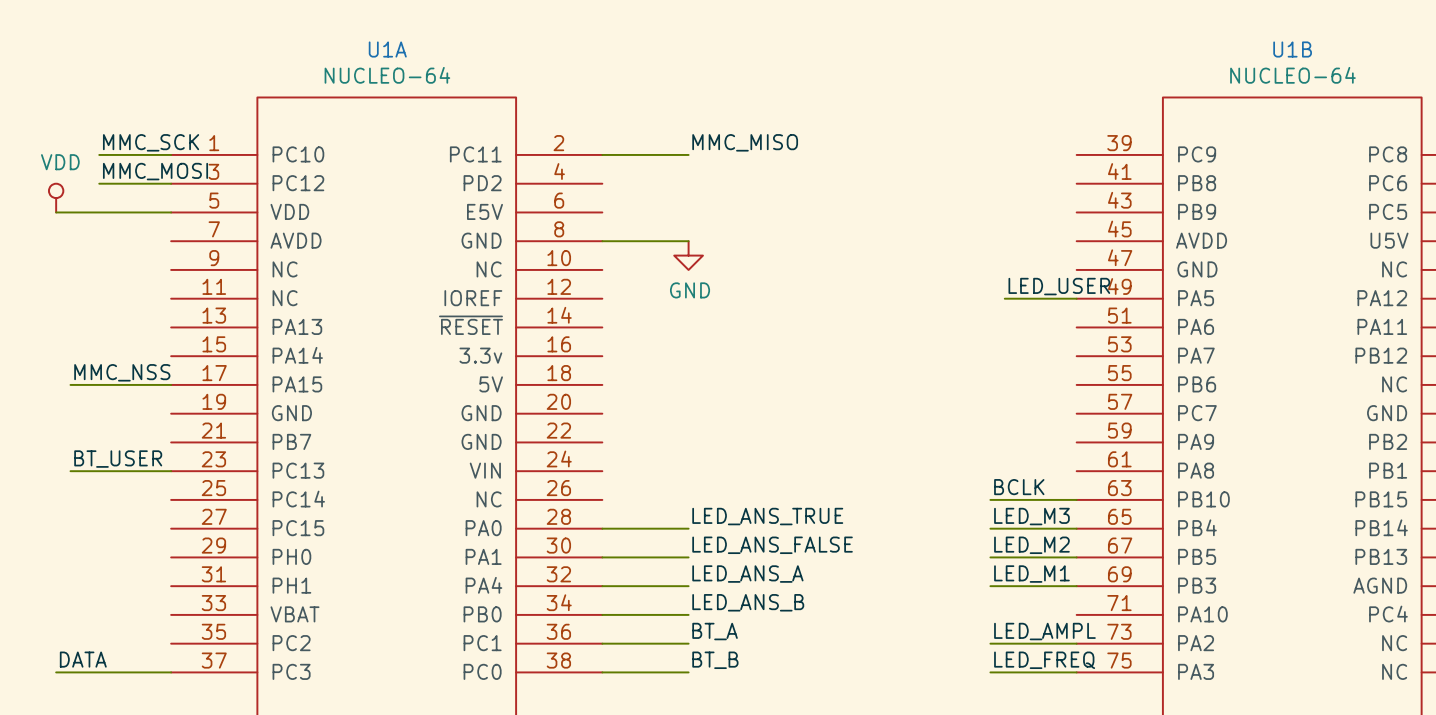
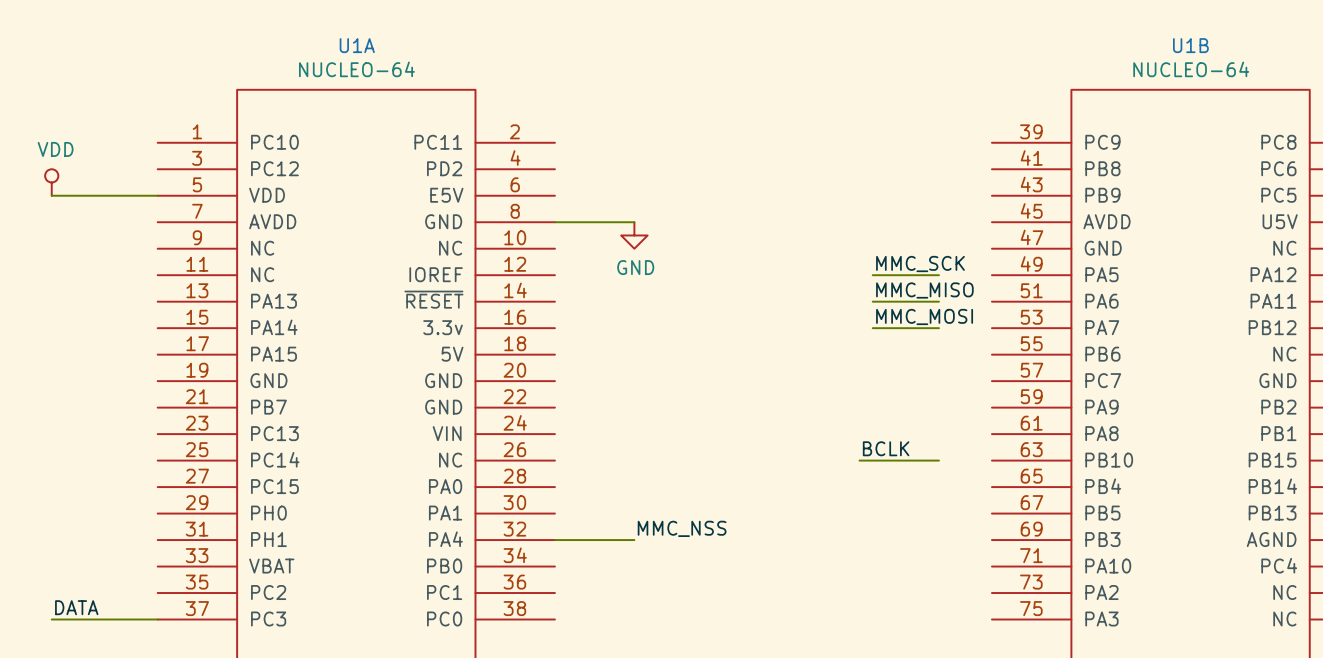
label: MMC_SCK (151, 142) -> none
label: MMC_MISO (745, 142) -> none
wire: (99, 154) (171, 154) -> none
wire: (602, 154) (688, 154) -> none
label: MMC_MOSI (155, 171) -> none
wire: (99, 183) (171, 183) -> none
label: none -> MMC_SCK (920, 264)
label: LED_USER (1059, 286) -> none
wire: (1019, 298) (1076, 298) -> (872, 275) (925, 275)
label: none -> MMC_MISO (924, 290)
wire: none -> (872, 301) (938, 301)
label: none -> MMC_MOSI (924, 316)
wire: none -> (872, 328) (938, 328)
label: MMC_NSS (122, 372) -> none
wire: (70, 384) (171, 384) -> none
label: BT_USER (118, 459) -> none
wire: (70, 471) (171, 471) -> none
label position: BCLK (1019, 487) -> BCLK (886, 448)
wire: (1019, 499) (1076, 499) -> (859, 460) (912, 460)
label: LED_ANS_TRUE (767, 516) -> none
label: LED_M3 (1031, 516) -> none
wire: (602, 528) (688, 528) -> none
wire: (990, 528) (1076, 528) -> none
label: LED_ANS_FALSE (772, 545) -> none
label: LED_M2 (1031, 545) -> none
wire: (602, 557) (688, 557) -> none
wire: (990, 557) (1076, 557) -> none
label: LED_ANS_A (747, 574) -> MMC_NSS (682, 528)
label: LED_M1 (1031, 574) -> none
wire: (990, 586) (1076, 586) -> none
label: LED_ANS_B (748, 602) -> none
wire: (602, 614) (688, 614) -> none
label: BT_A (715, 631) -> none
label: LED_AMPL (1044, 631) -> none
wire: (602, 643) (688, 643) -> none
wire: (990, 643) (1076, 643) -> none
label: BT_B (715, 660) -> none
label: LED_FREQ (1044, 660) -> none
wire: (602, 672) (688, 672) -> none
wire: (990, 672) (1076, 672) -> none

